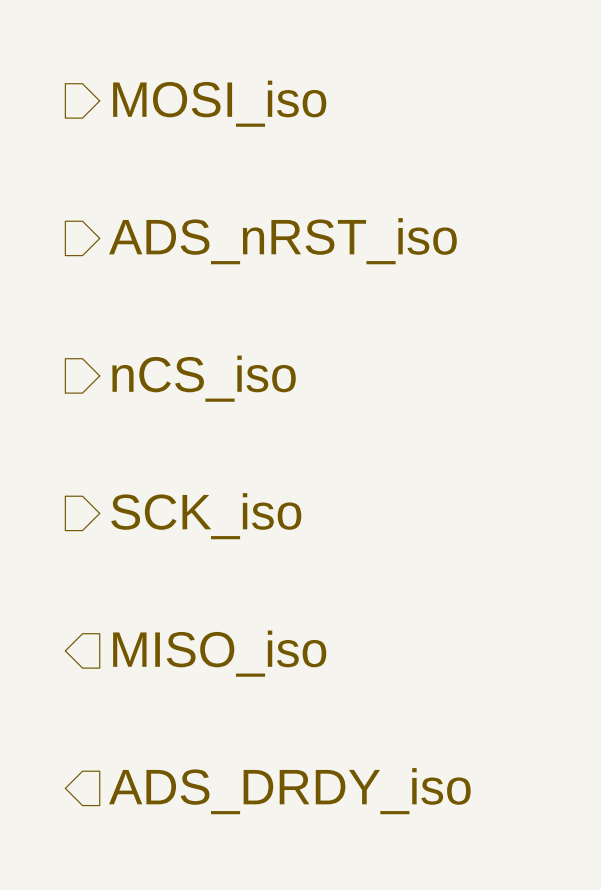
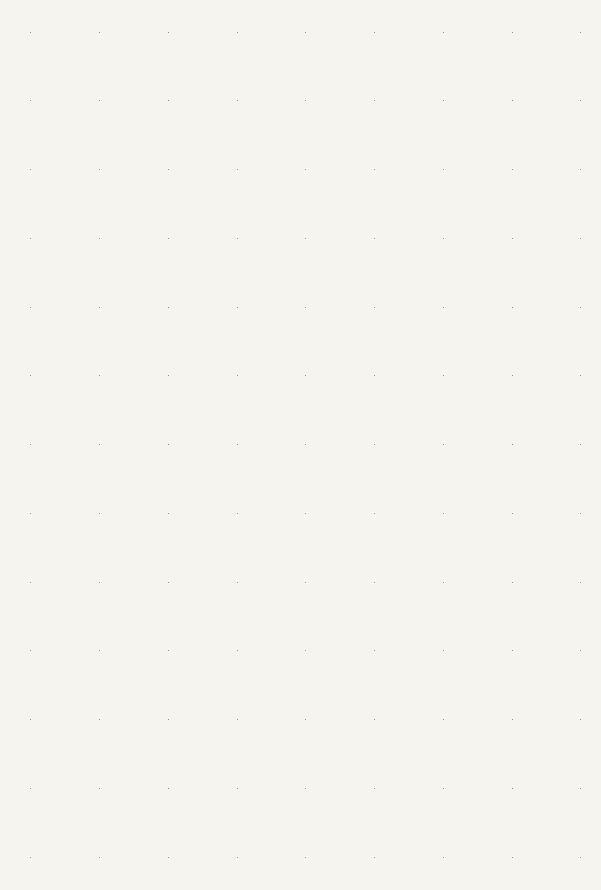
hierarchical label: MOSI_iso (219, 103) -> none
hierarchical label: ADS_nRST_iso (282, 241) -> none
hierarchical label: nCS_iso (204, 378) -> none
hierarchical label: SCK_iso (206, 516) -> none
hierarchical label: MISO_iso (219, 653) -> none
hierarchical label: ADS_DRDY_iso (289, 791) -> none

